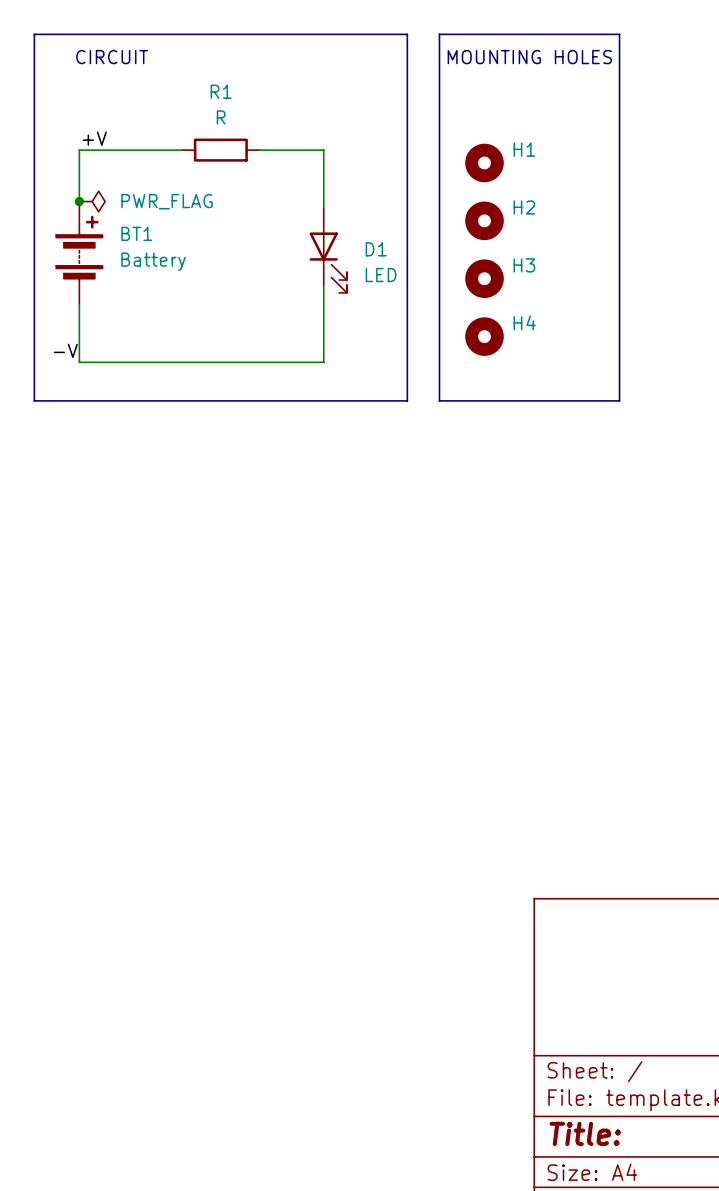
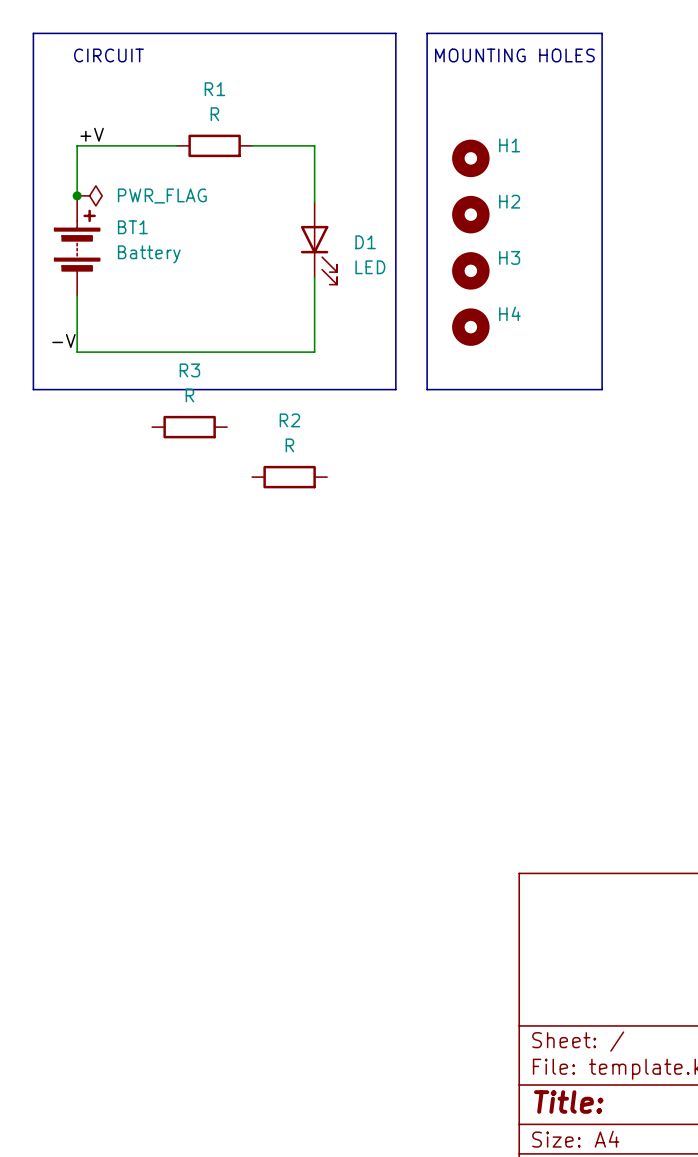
R3: none -> R (189, 427)
R2: none -> R (289, 477)

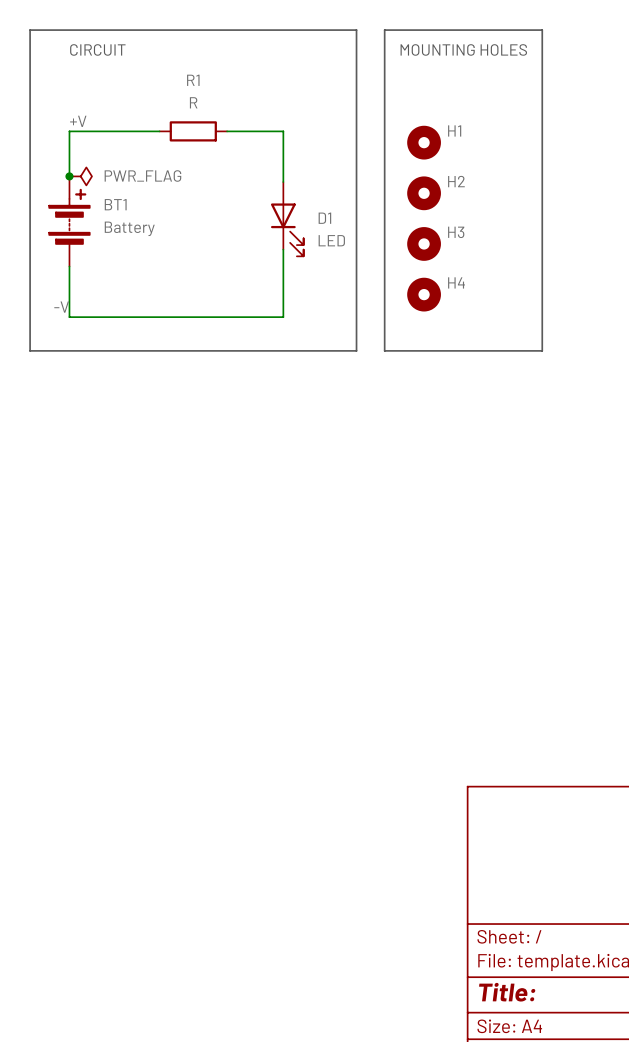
R3: R (189, 427) -> none
R2: R (289, 477) -> none

